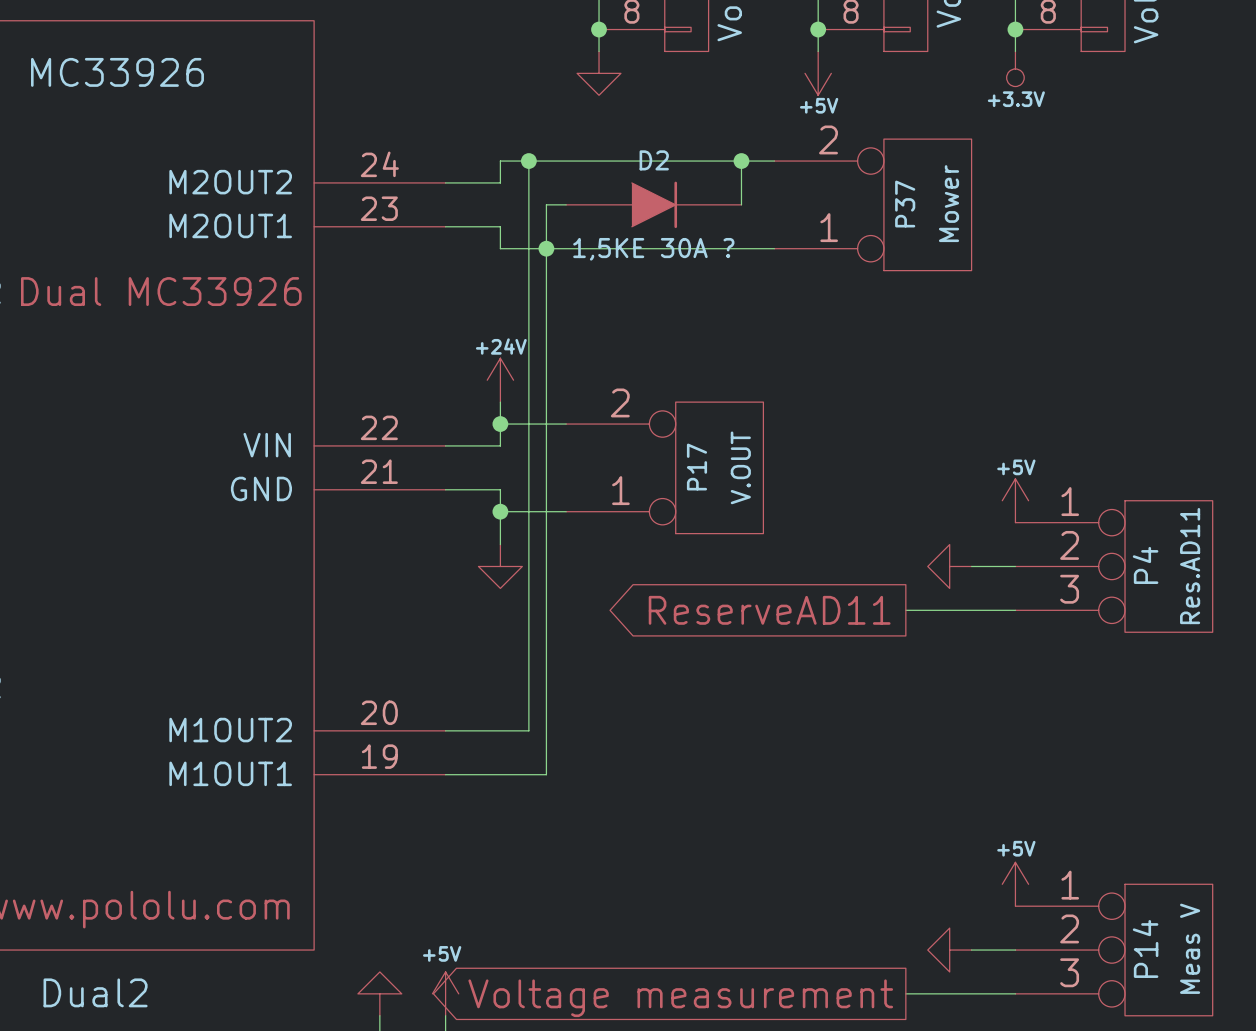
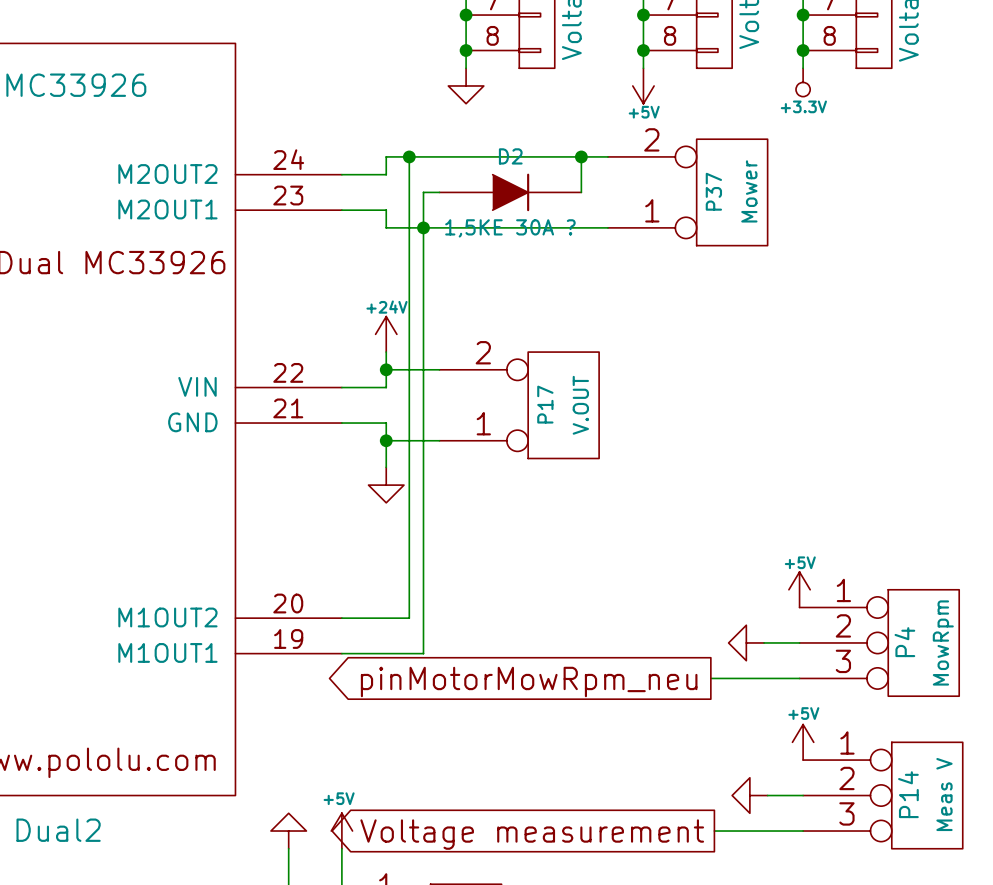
power symbol position: +5V (1015, 500) -> +5V (799, 589)
power symbol position: (949, 566) -> (746, 642)
wire: (971, 566) (1015, 566) -> (764, 642) (799, 642)
P4 position: (1114, 566) -> (879, 642)
P4 value: Res.AD11 (1190, 566) -> MowRpm (943, 642)
global label: ReserveAD11 (769, 610) -> none
wire: (905, 610) (1015, 610) -> (710, 678) (799, 678)
global label: none -> pinMotorMowRpm_neu (529, 682)

